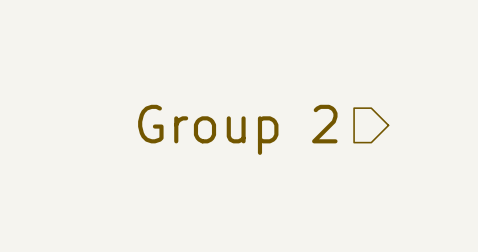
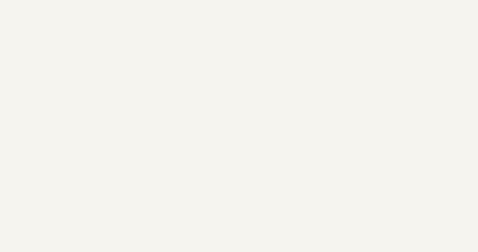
hierarchical label: Group 2 (237, 129) -> none

